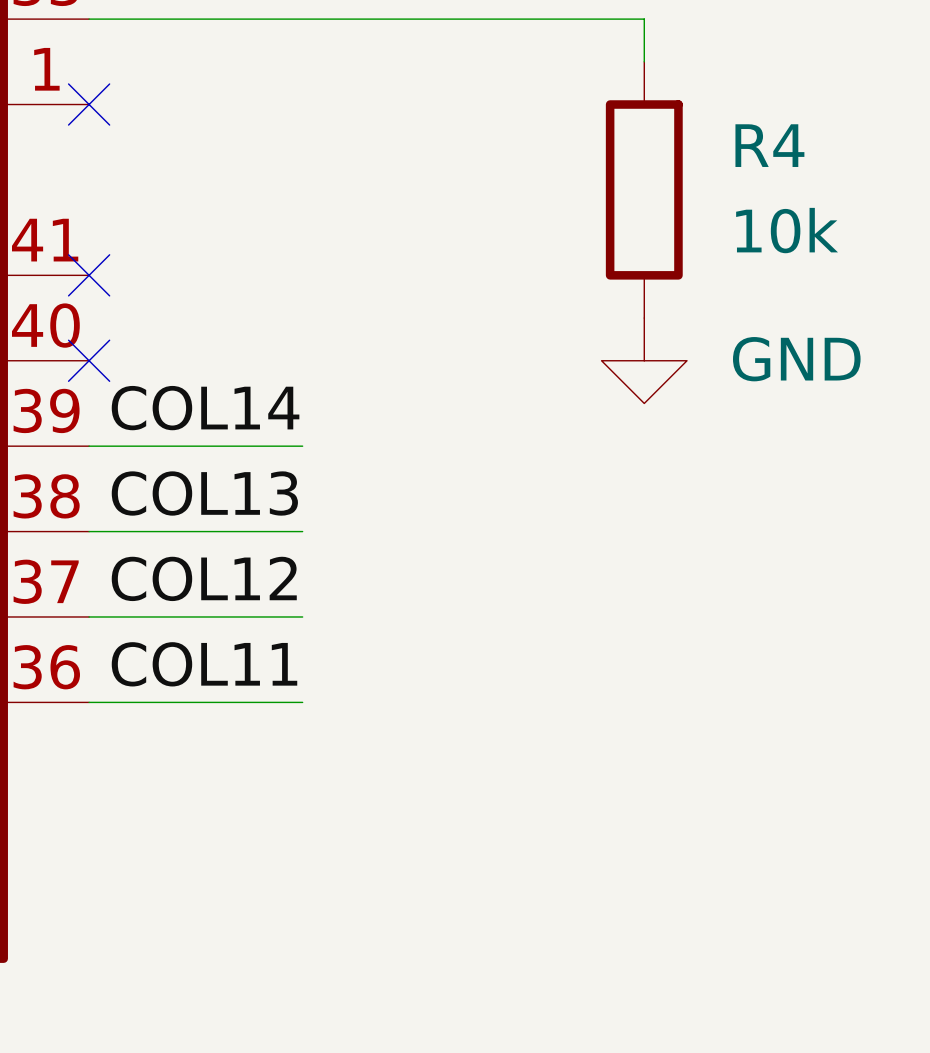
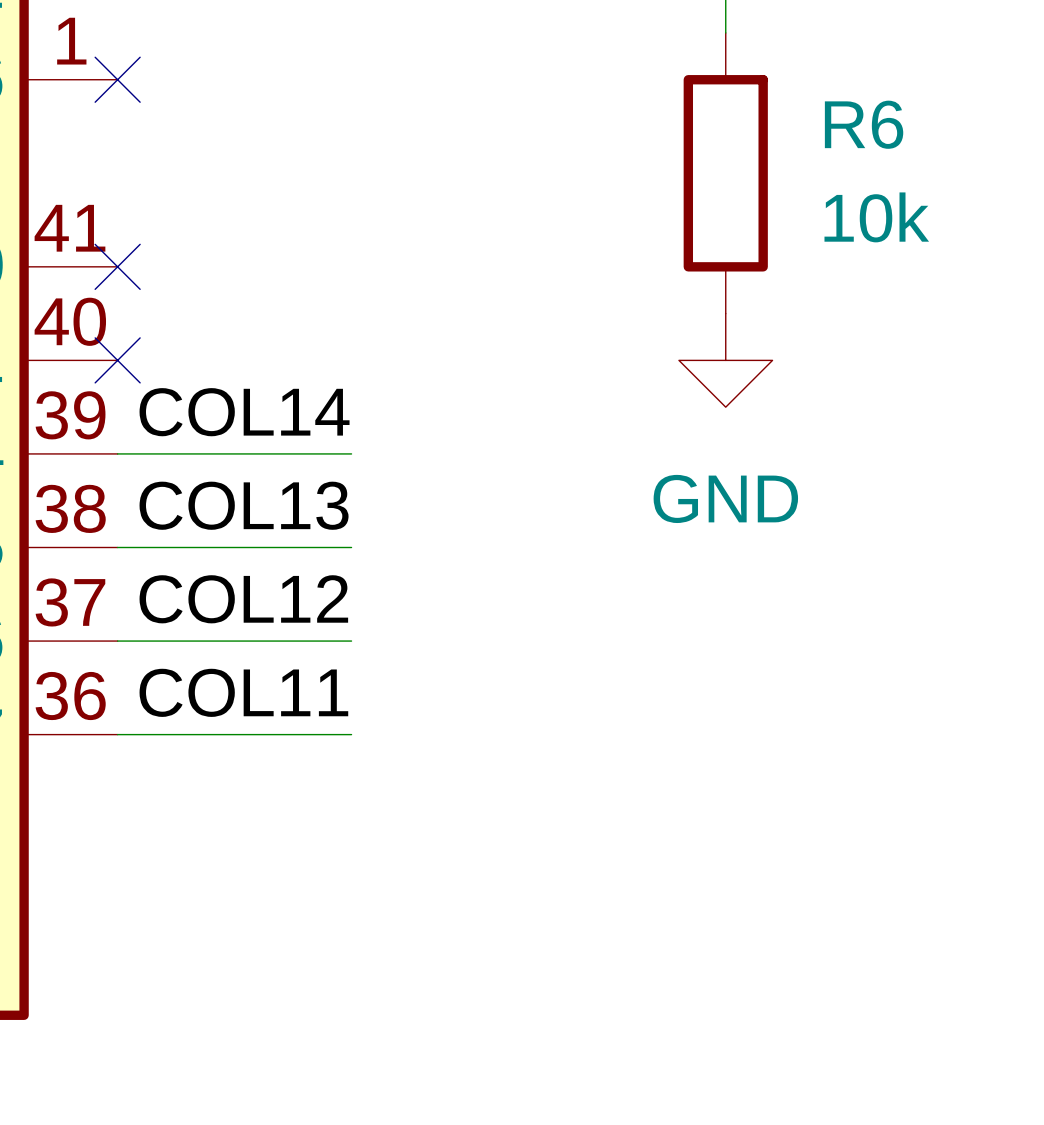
R4 name: R4 (769, 145) -> R6 (864, 124)
power symbol text position: GND (796, 359) -> GND (725, 498)

